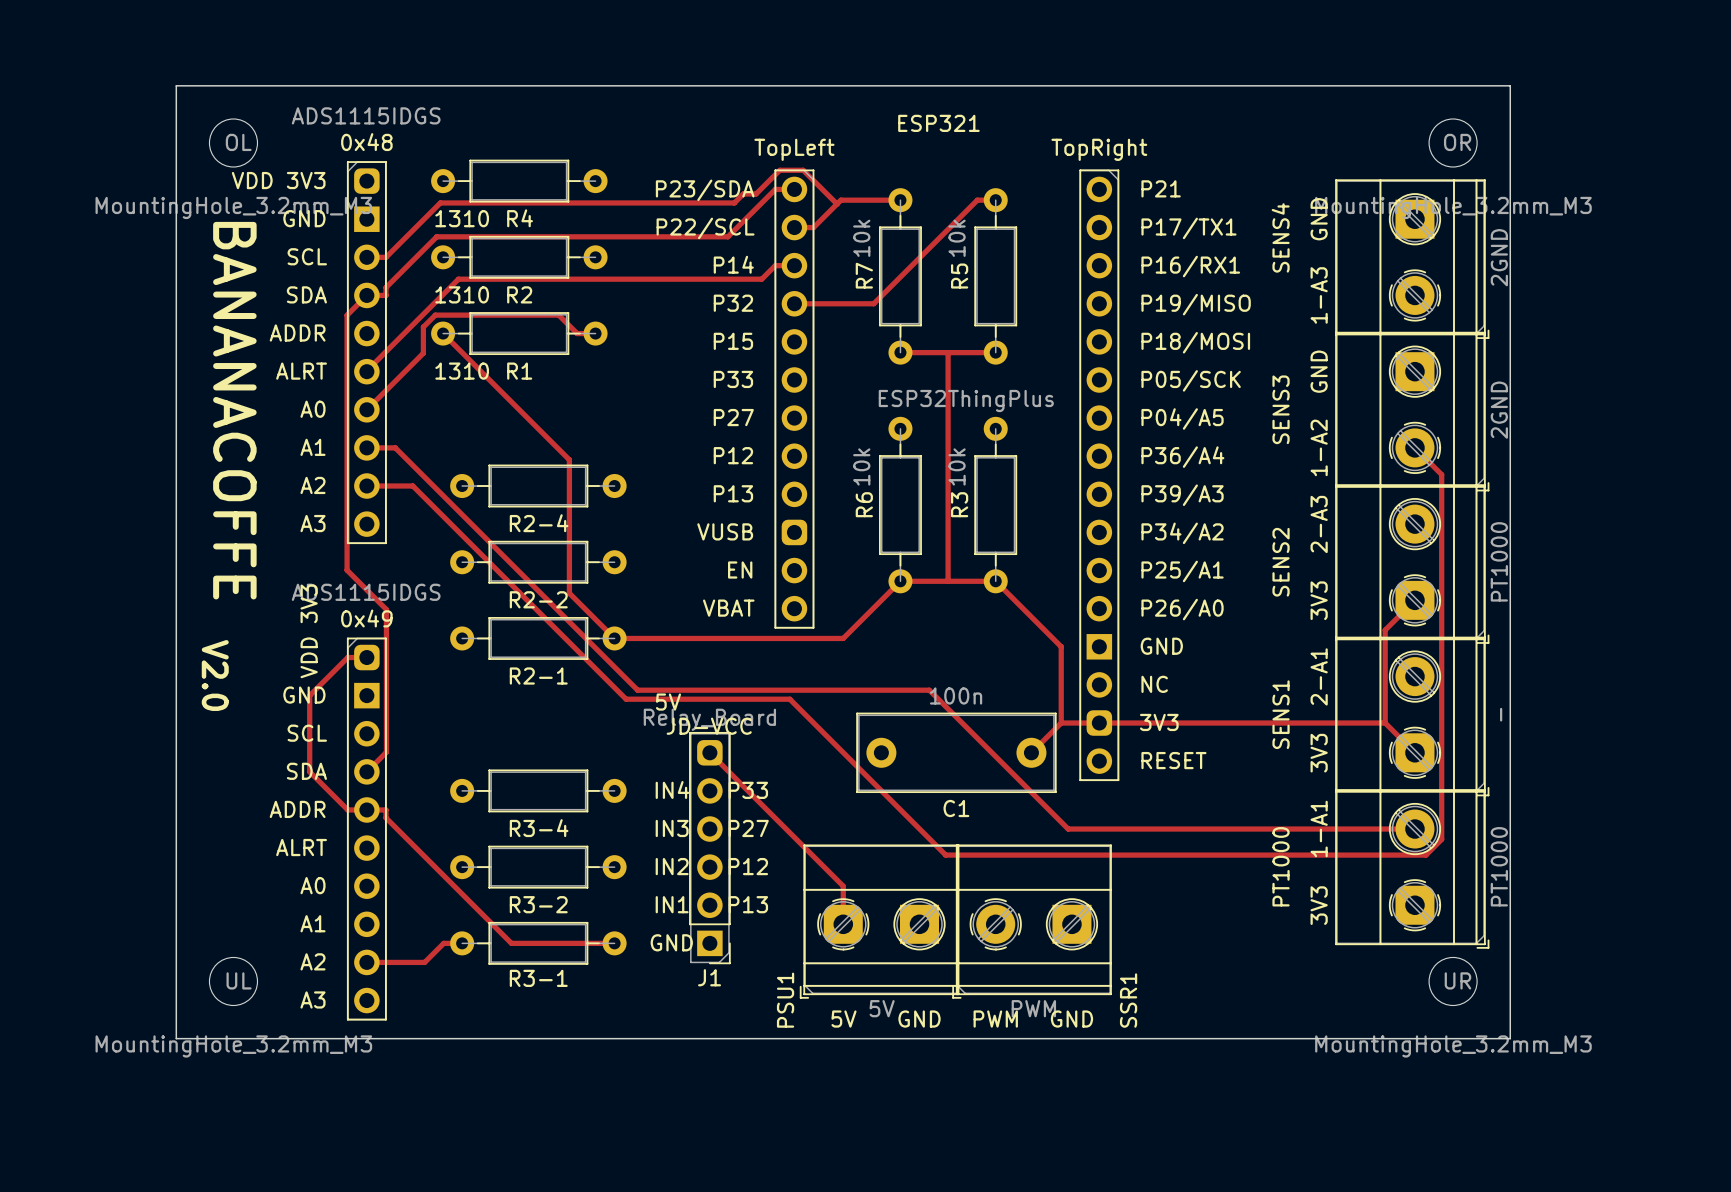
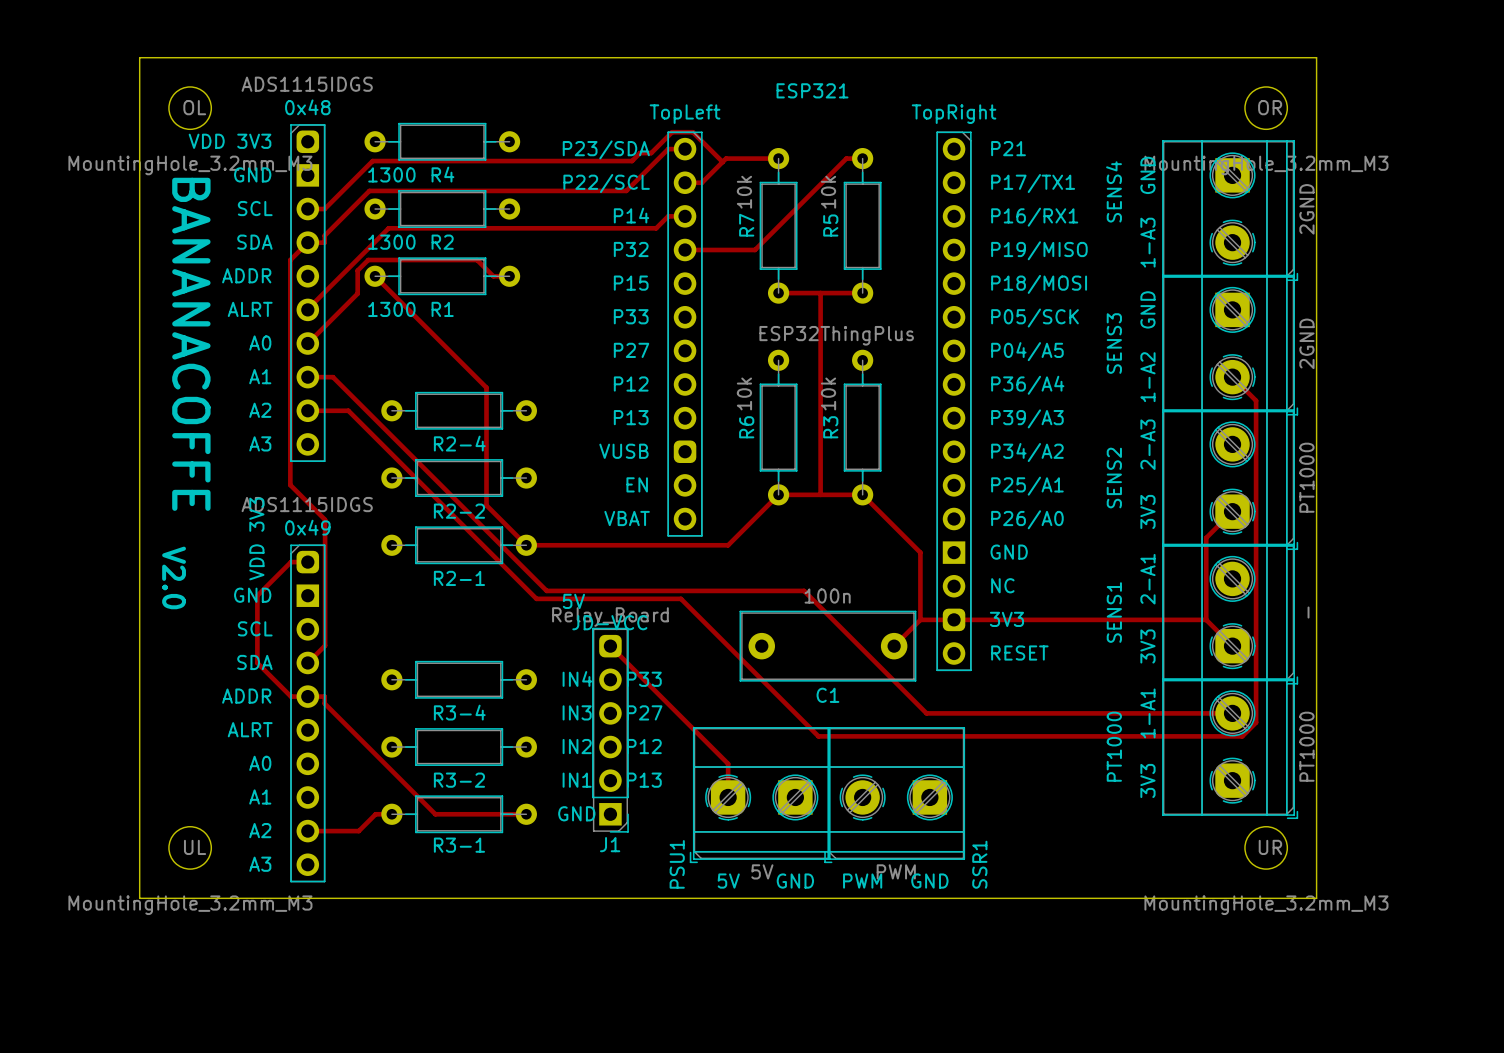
R4 value: 1310 (462, 218) -> 1300 (391, 174)
R2 value: 1310 (462, 294) -> 1300 (391, 242)
R1 value: 1310 (462, 371) -> 1300 (391, 309)

